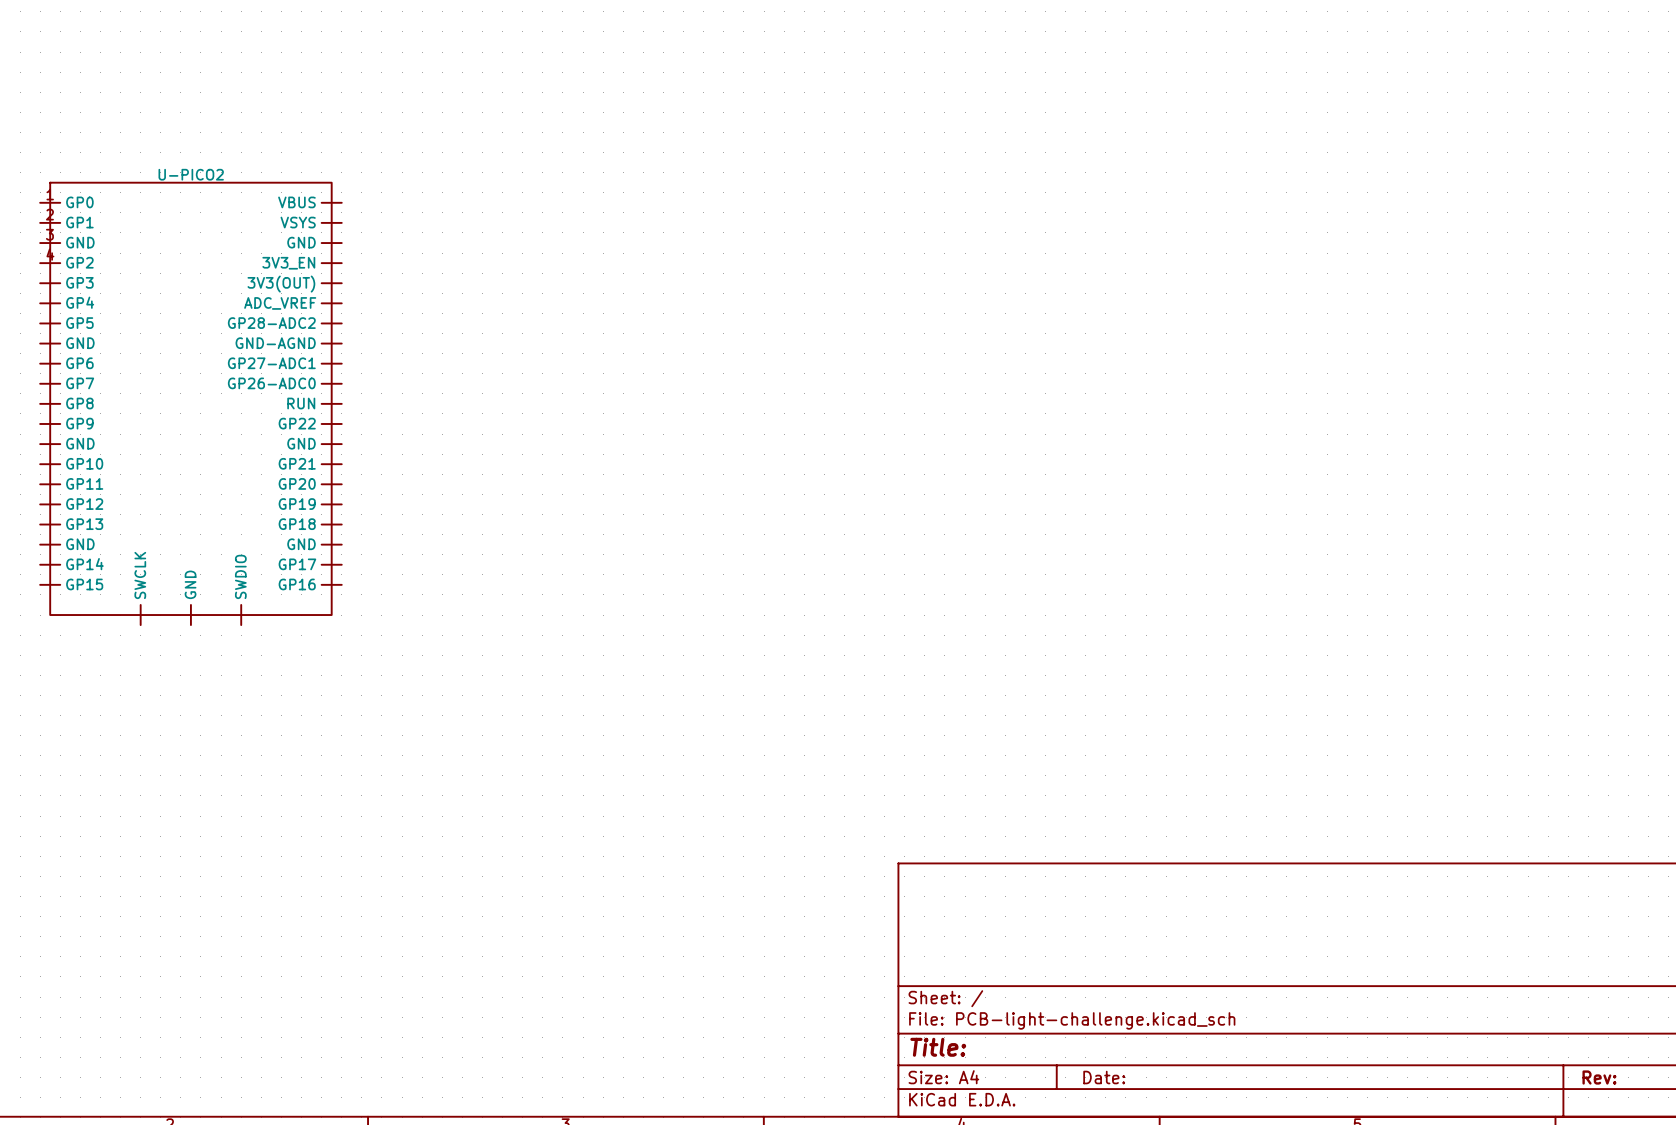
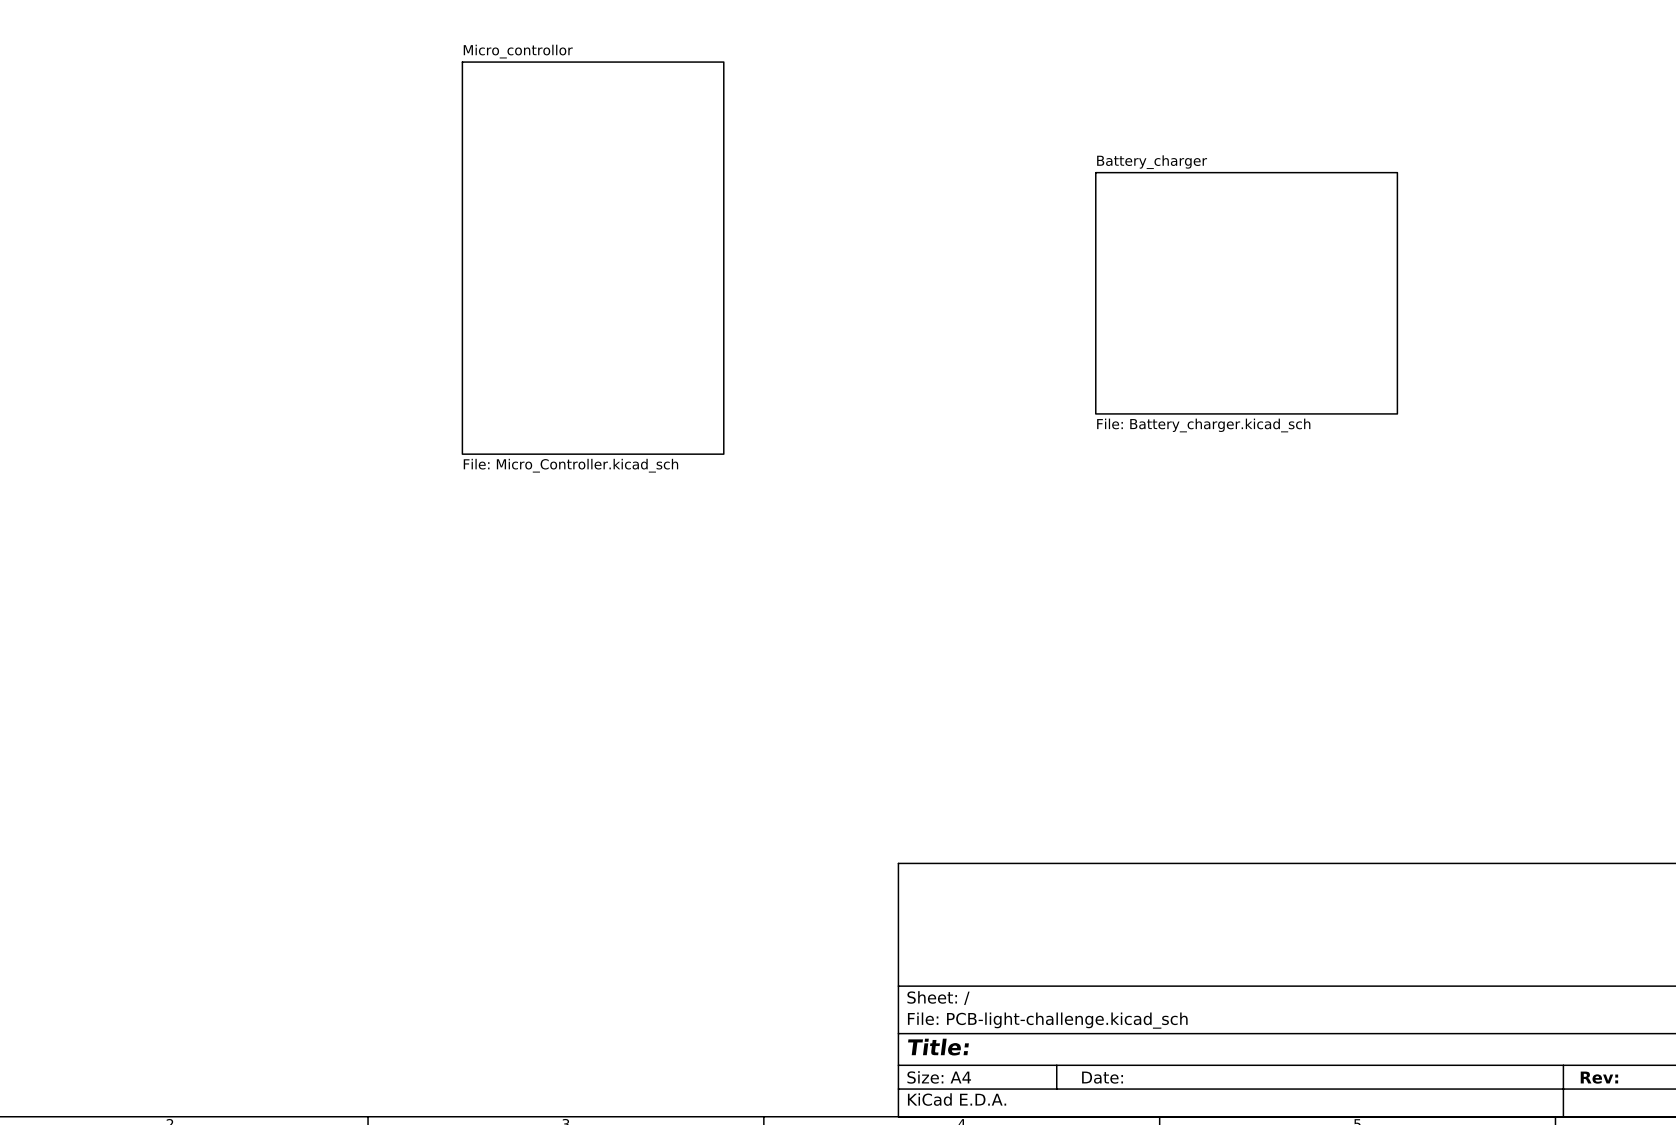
sheet Micro_controllor: none -> File: Micro_Controller.kicad_sch (593, 258)
sheet Battery_charger: none -> File: Battery_charger.kicad_sch (1246, 293)
U-PICO2: (190, 403) -> none

